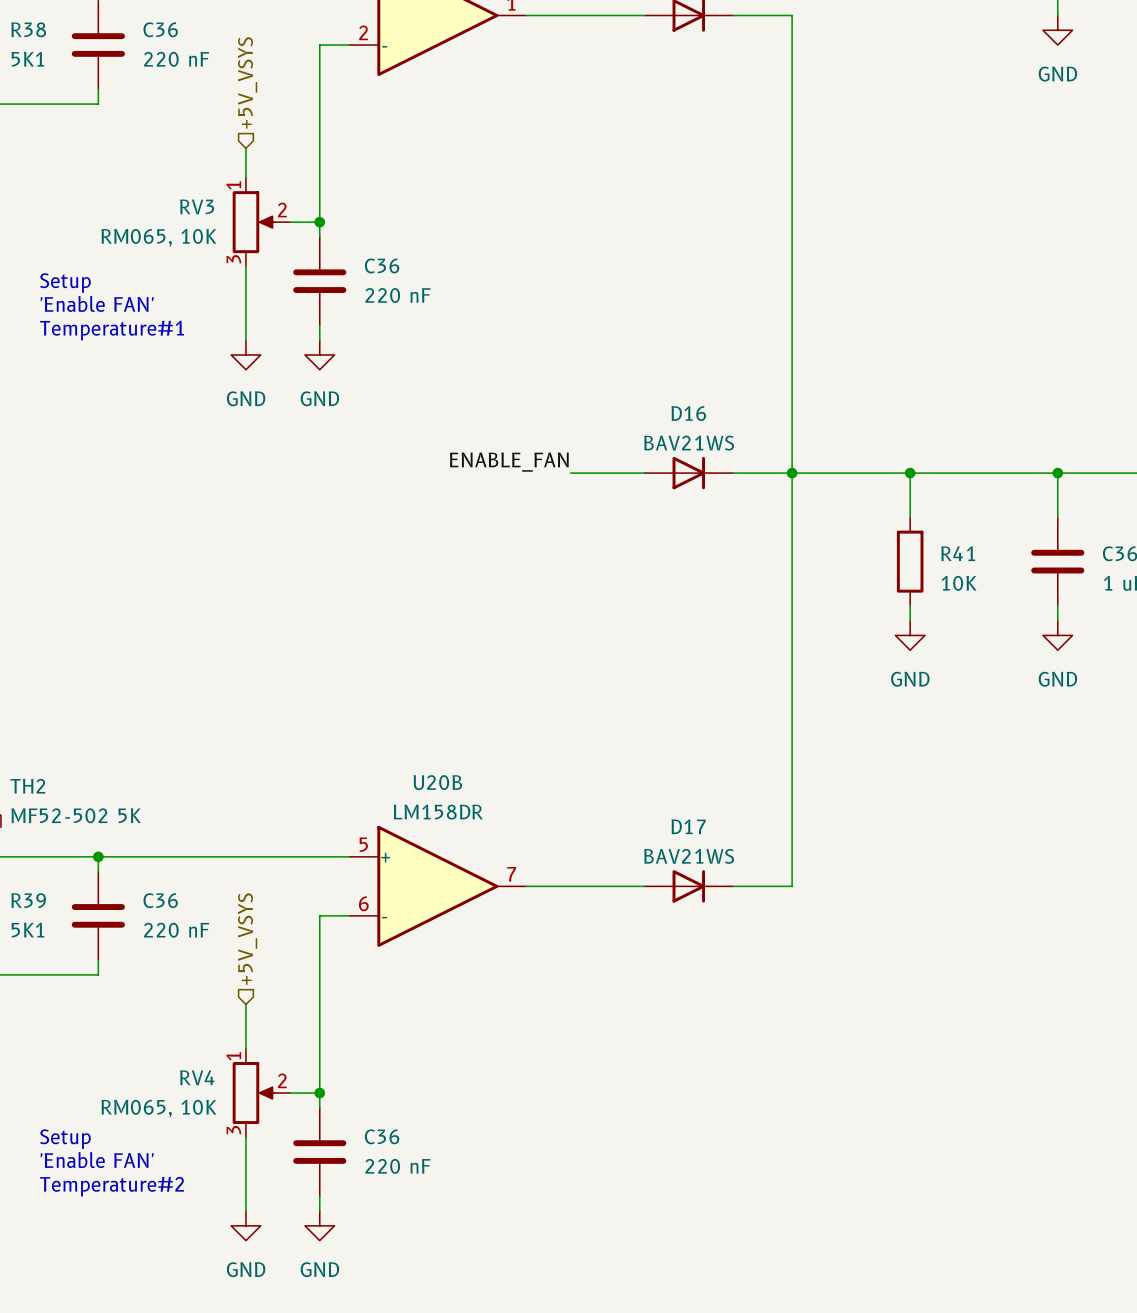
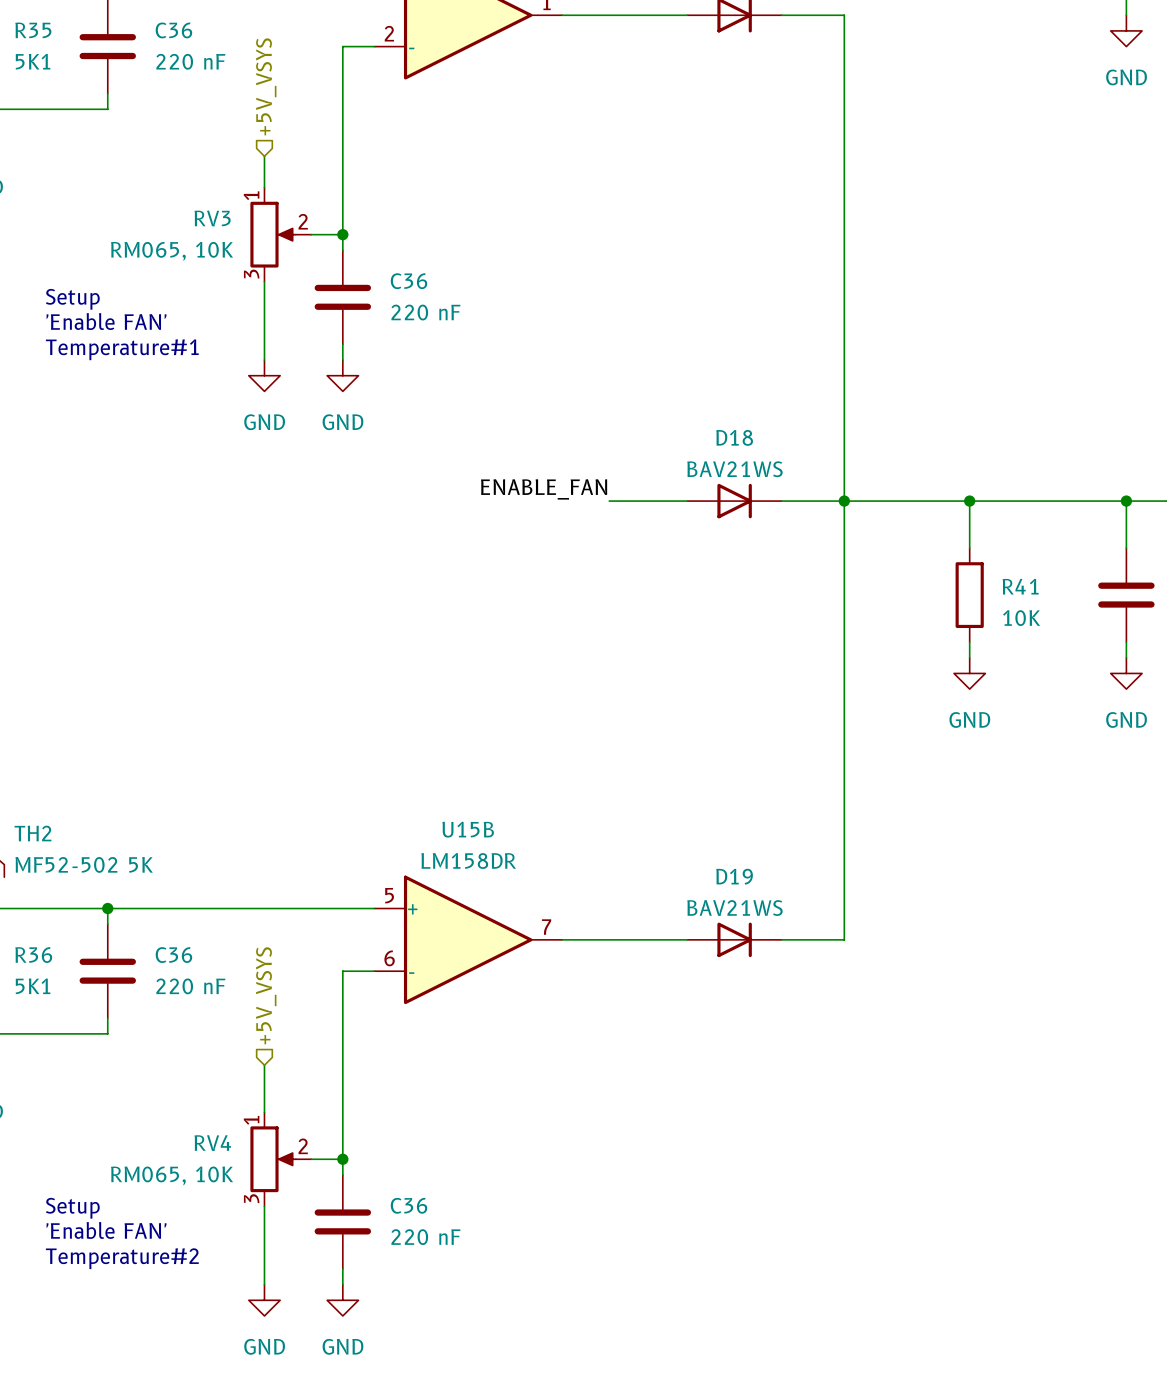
R38 name: R38 (28, 29) -> R35 (33, 30)
D16 name: D16 (688, 413) -> D18 (734, 437)
U20B name: U20B (437, 782) -> U15B (468, 829)
D17 name: D17 (688, 826) -> D19 (734, 876)
R39 name: R39 (28, 900) -> R36 (33, 955)

